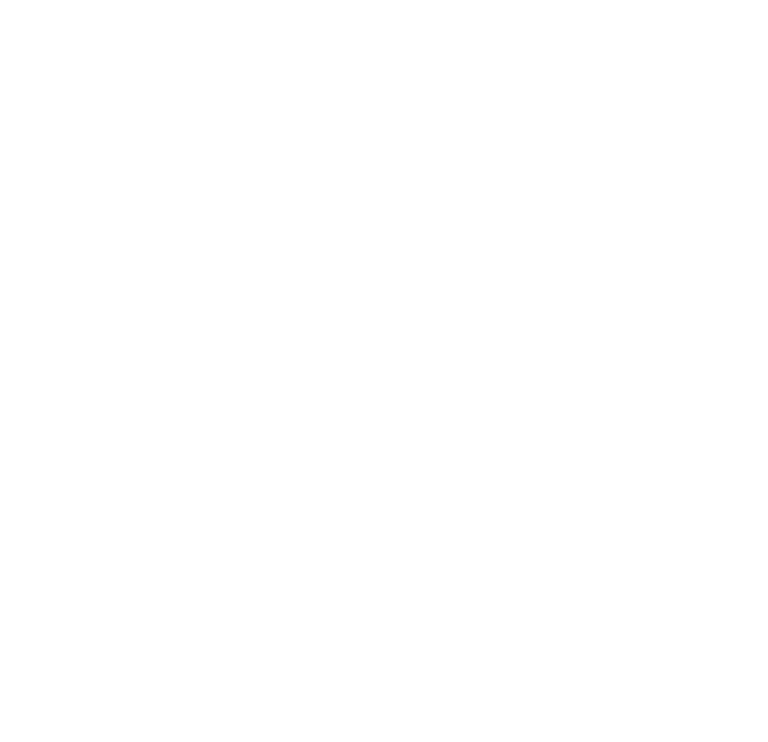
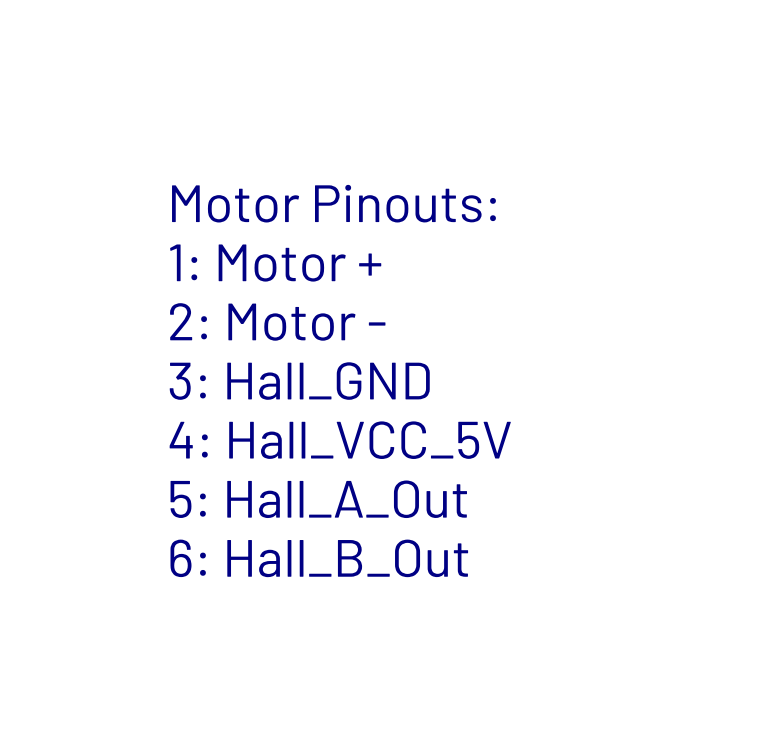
text: none -> Motor Pinouts: (333, 203)
text: none -> 1: Motor + (275, 263)
text: none -> 2: Motor - (277, 321)
text: none -> 3: Hall_GND (299, 381)
text: none -> 4: Hall_VCC_5V (340, 440)
text: none -> 5: Hall_A_Out (318, 499)
text: none -> 6: Hall_B_Out (319, 558)

